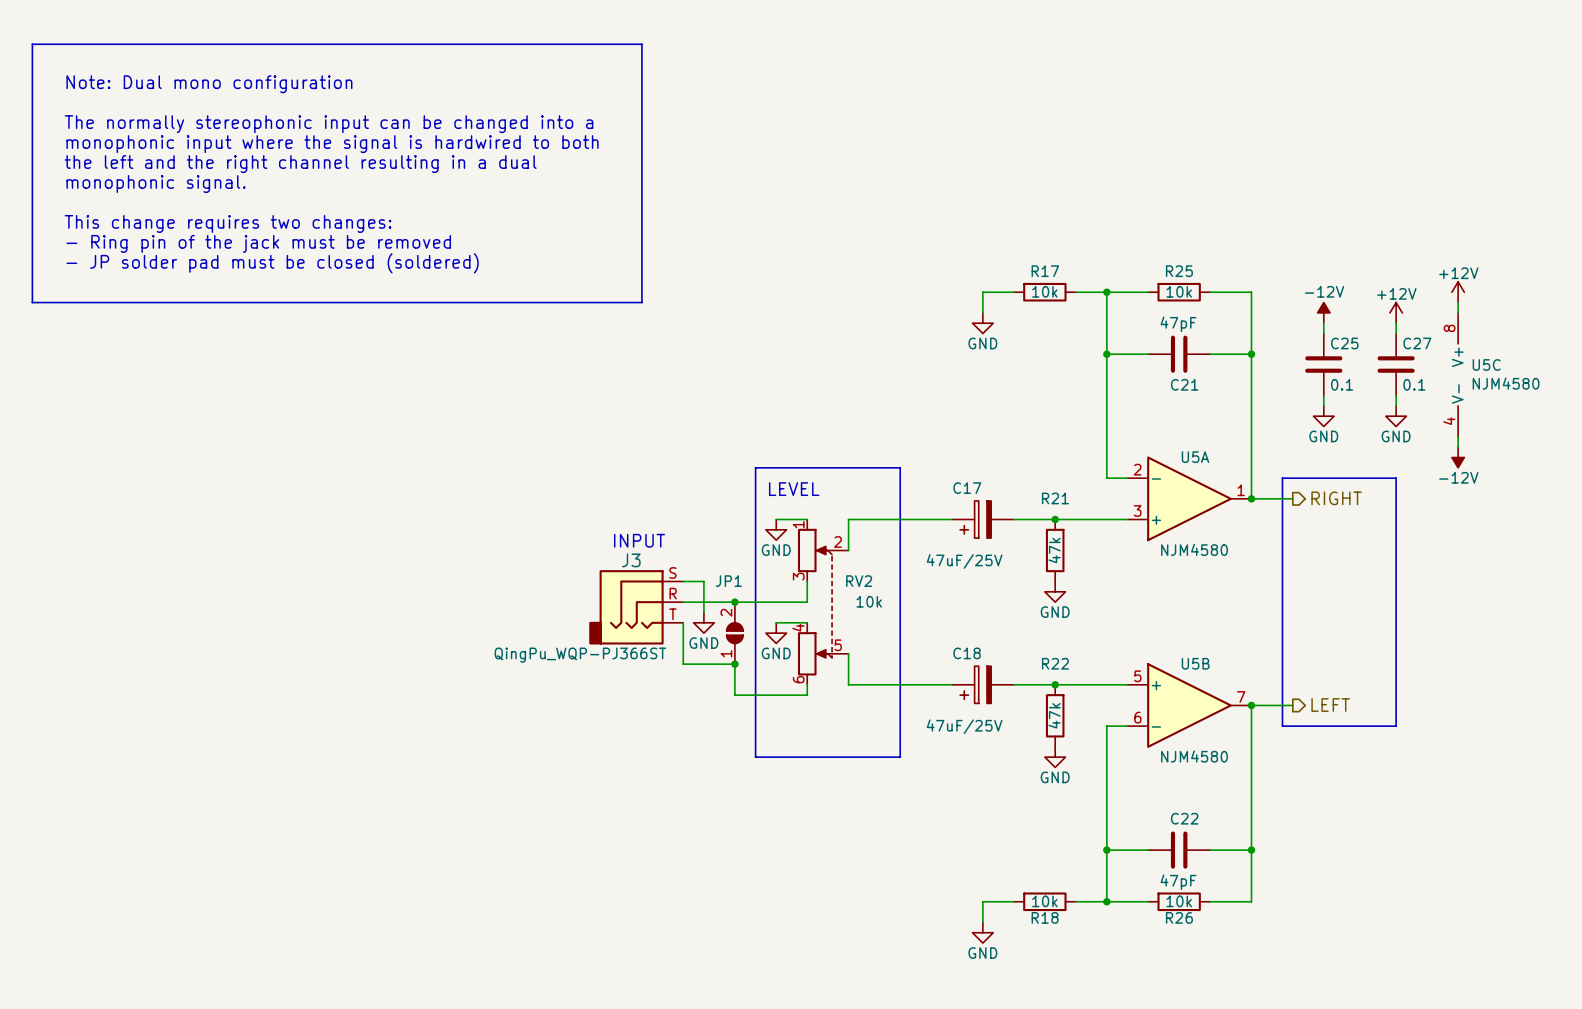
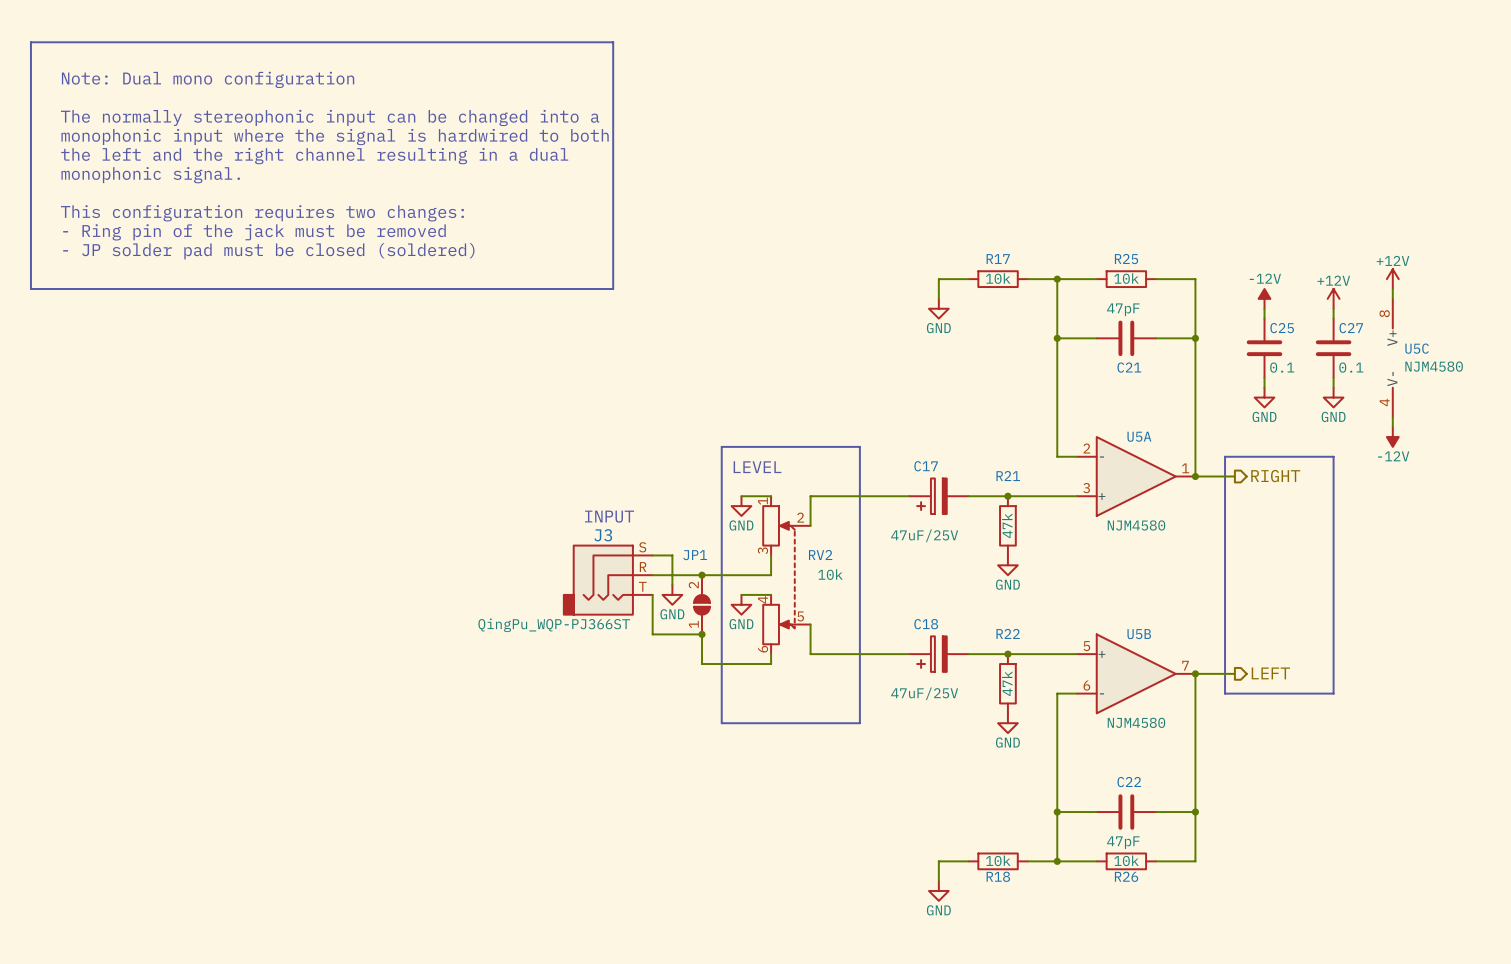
text: This change requires two changes: (228, 223) -> This configuration requires two changes: (262, 213)

